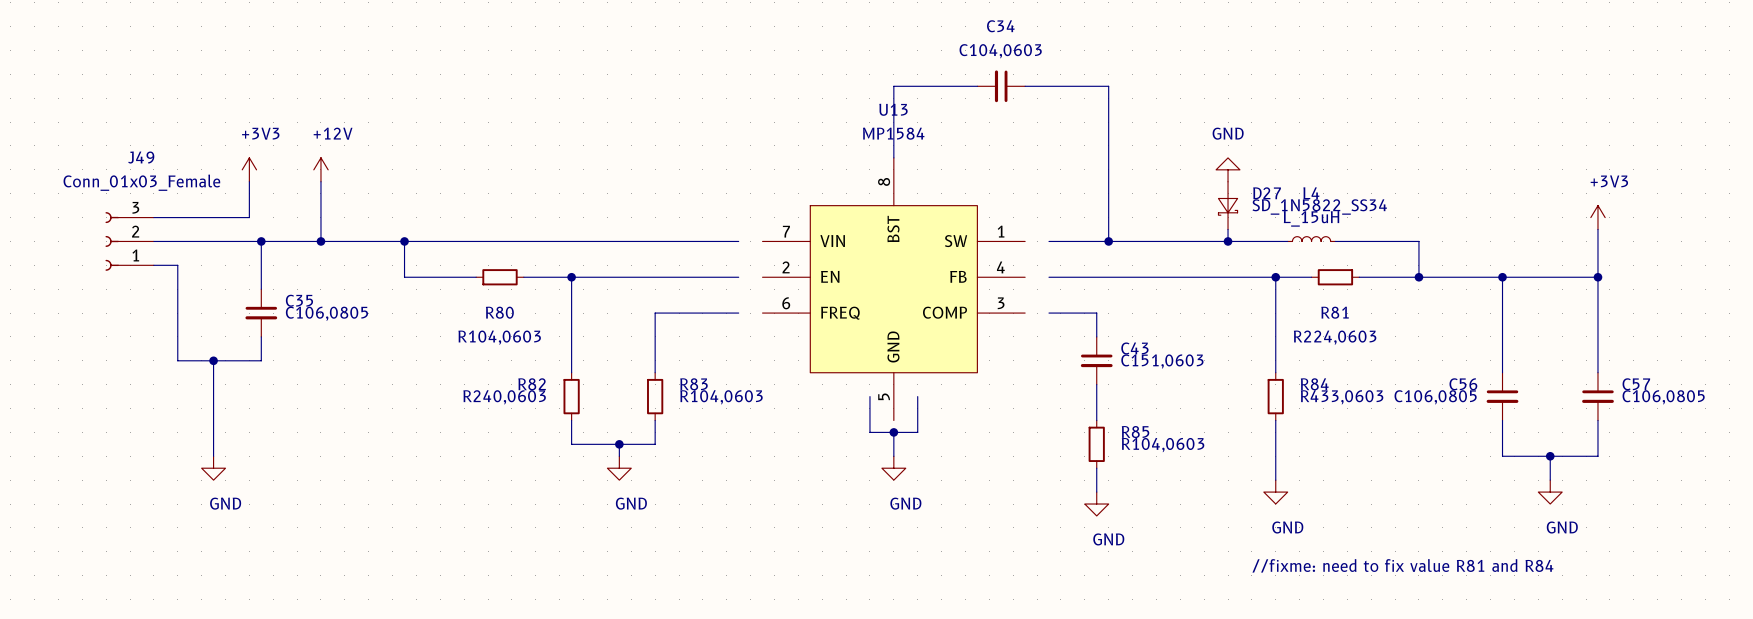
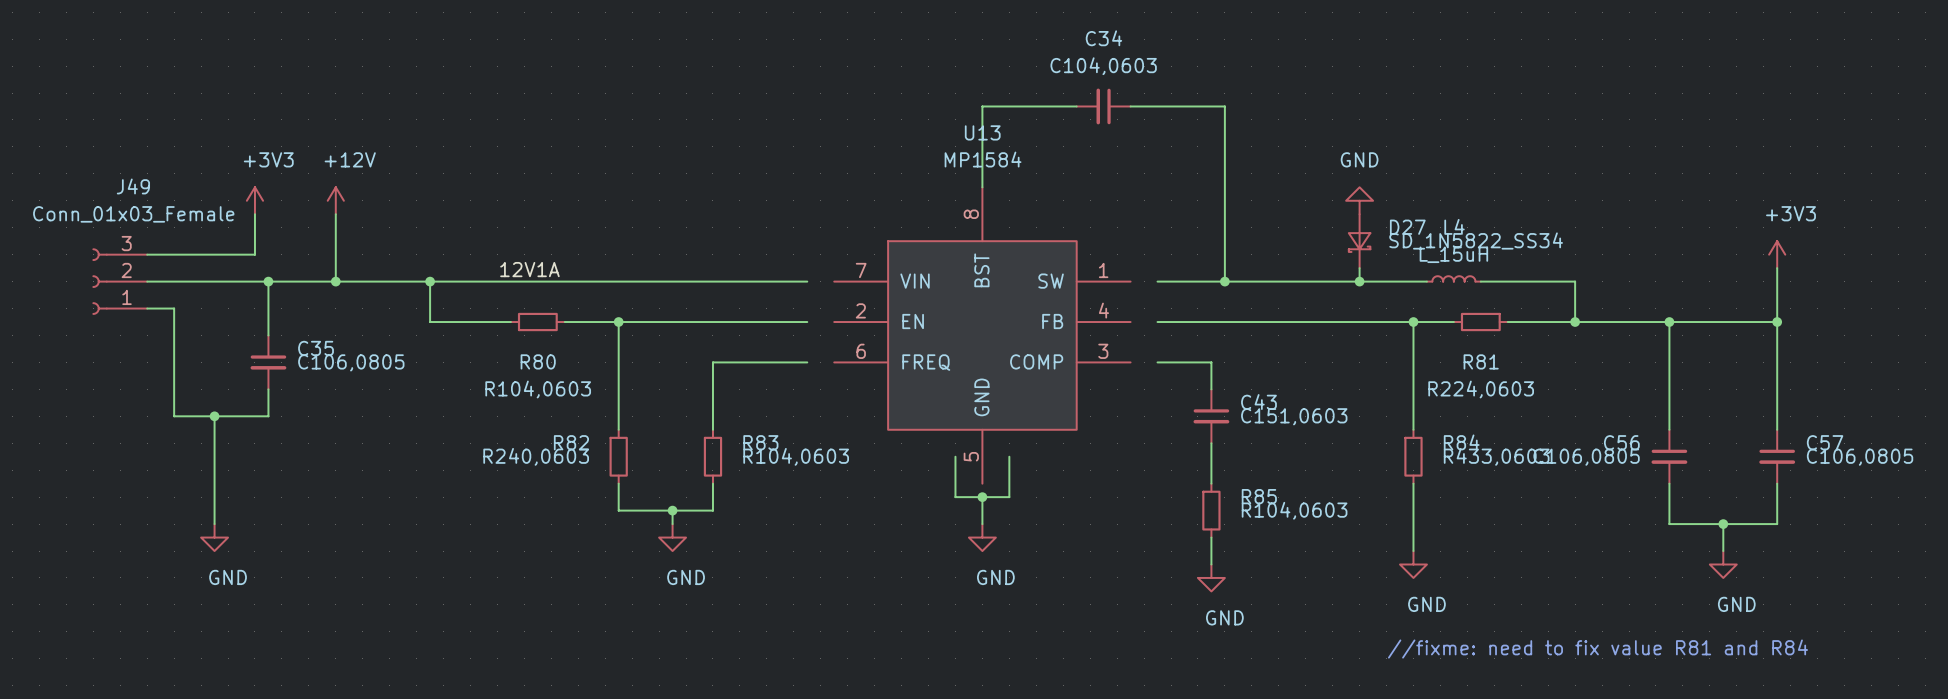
label: none -> 12V1A (529, 269)

